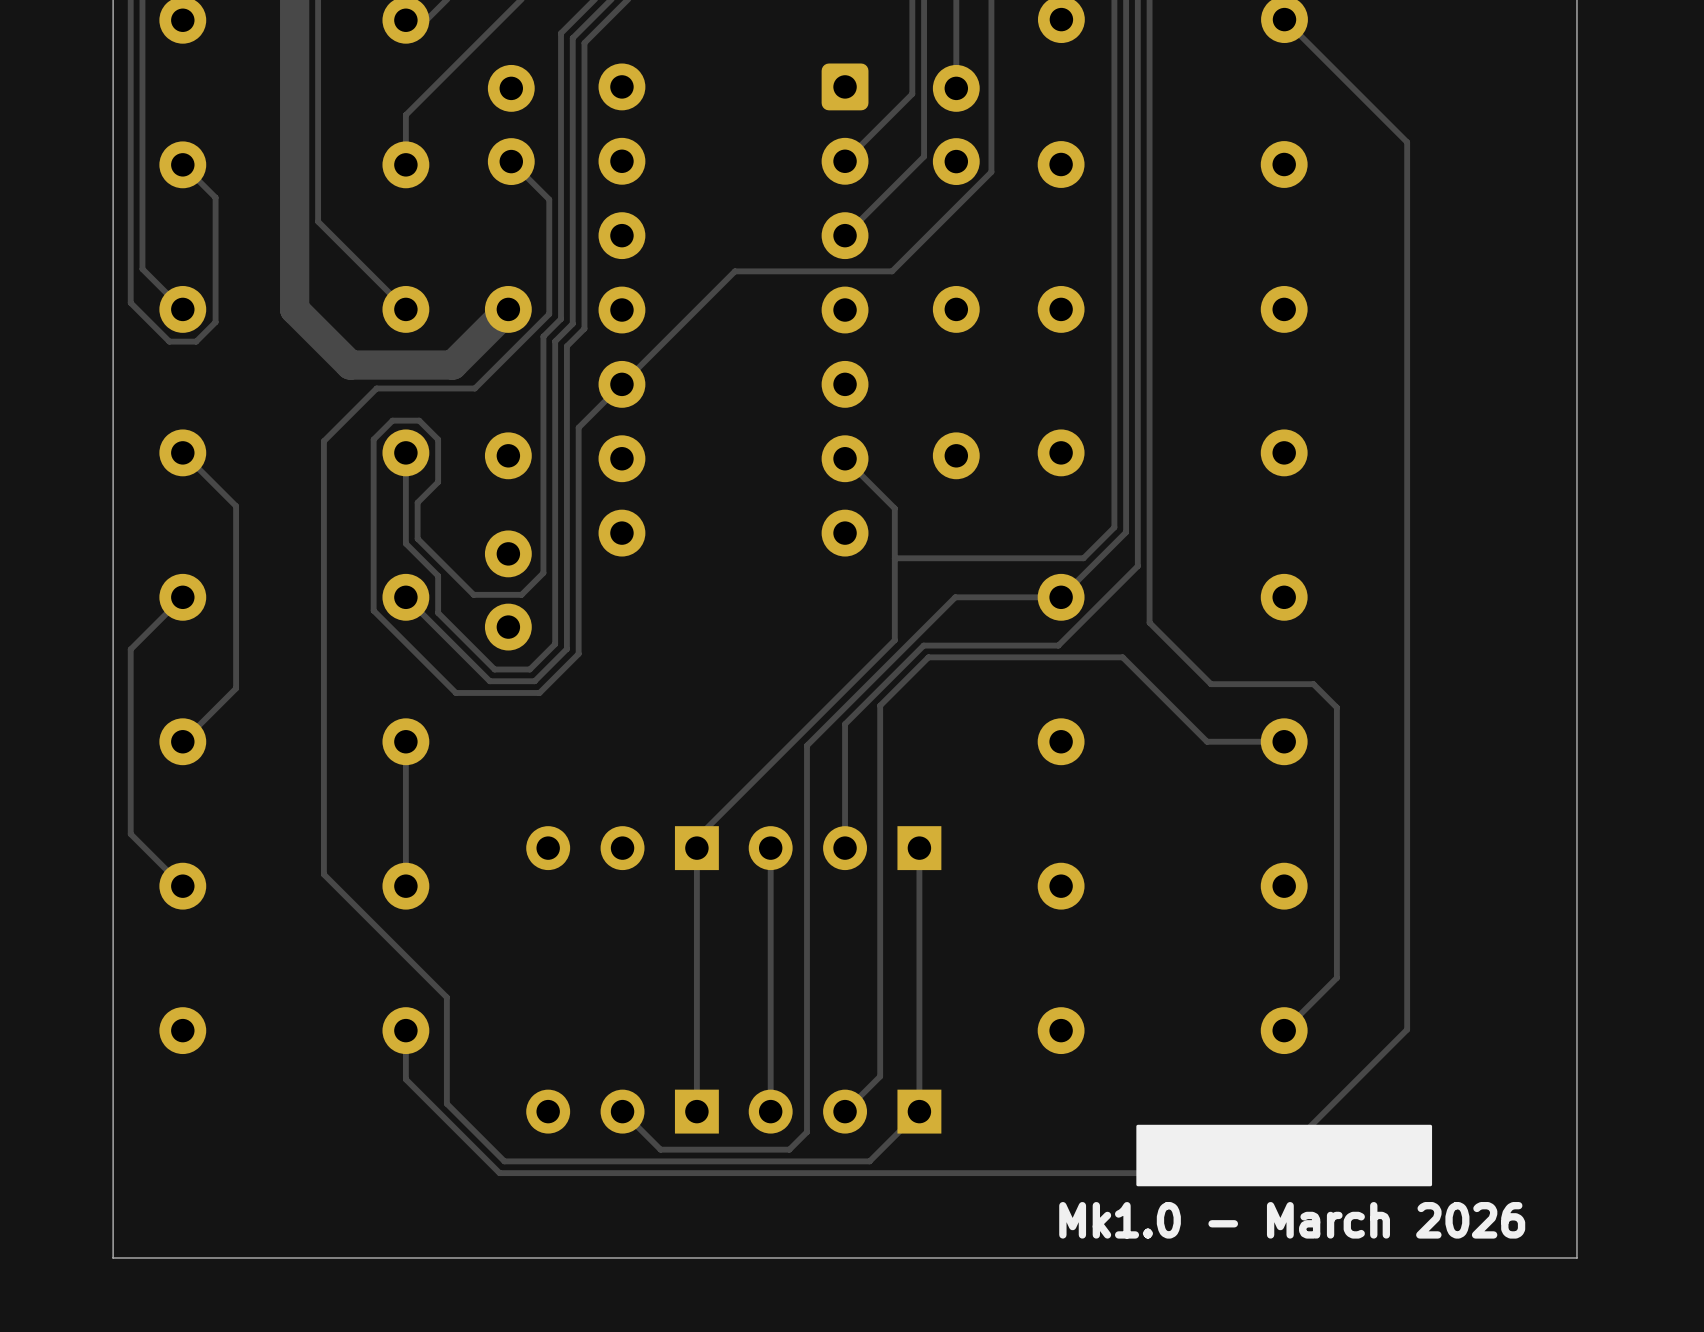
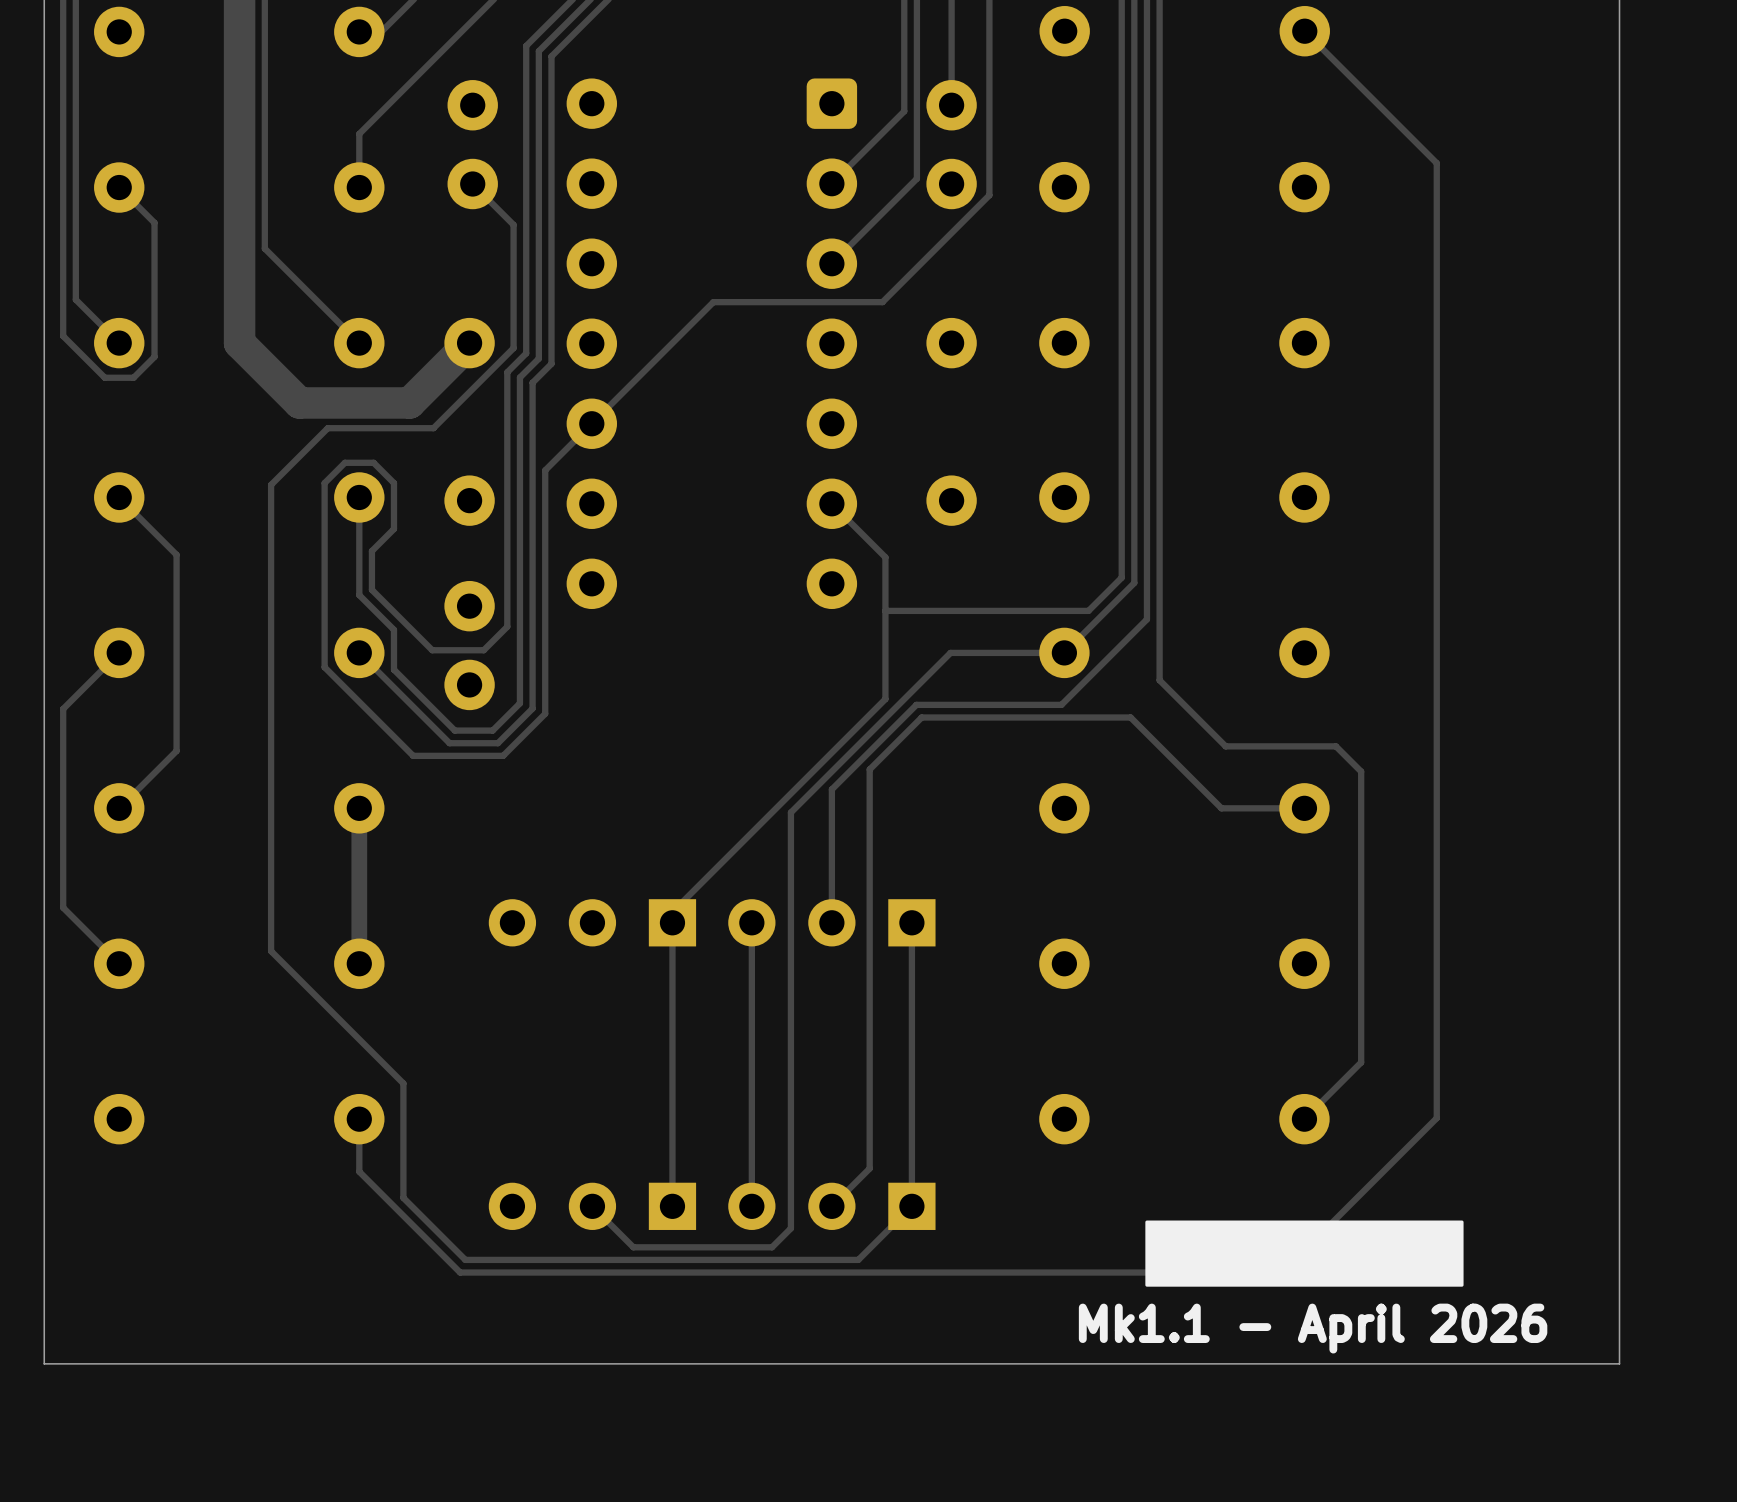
track width: thin (405, 741) (405, 886) -> thick (359, 808) (359, 963)
text: Mk1.0 - March 2026 (1292, 1220) -> Mk1.1 - April 2026 (1313, 1328)

